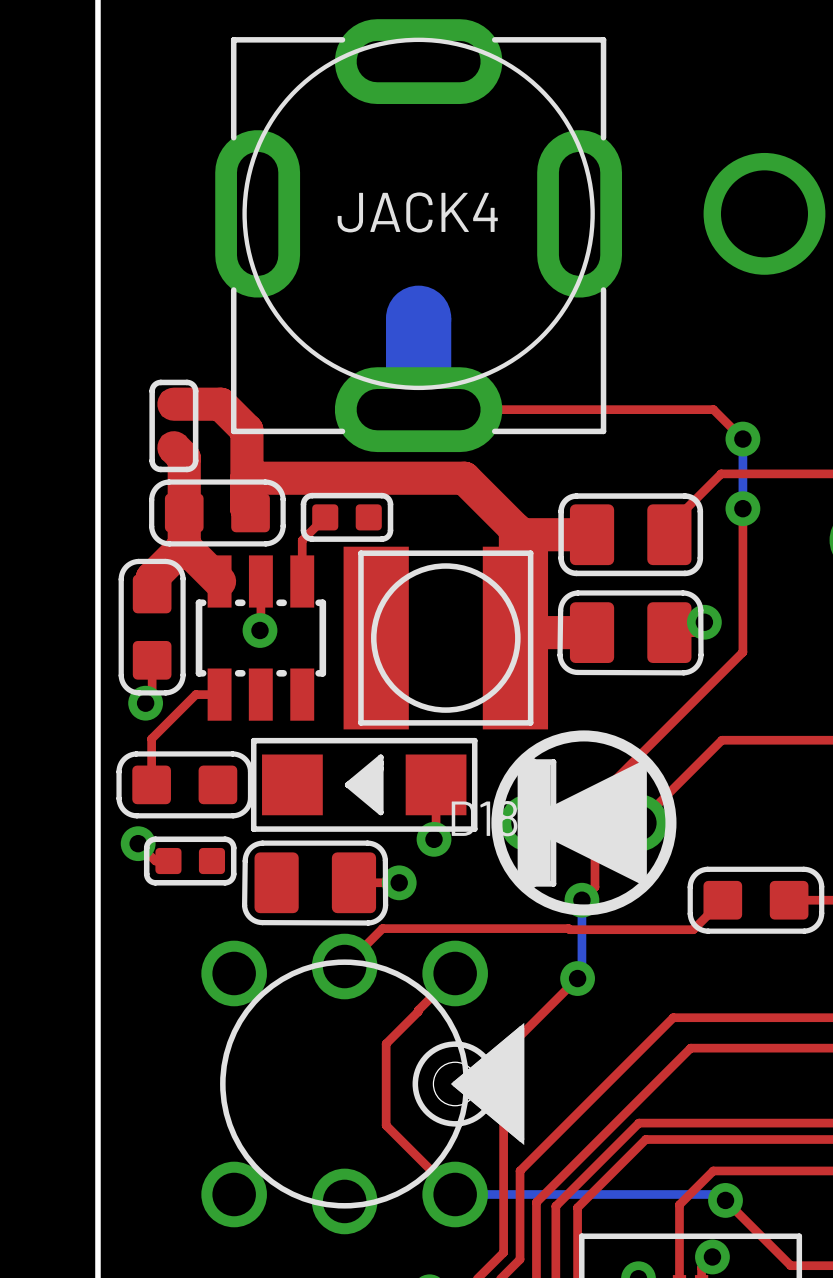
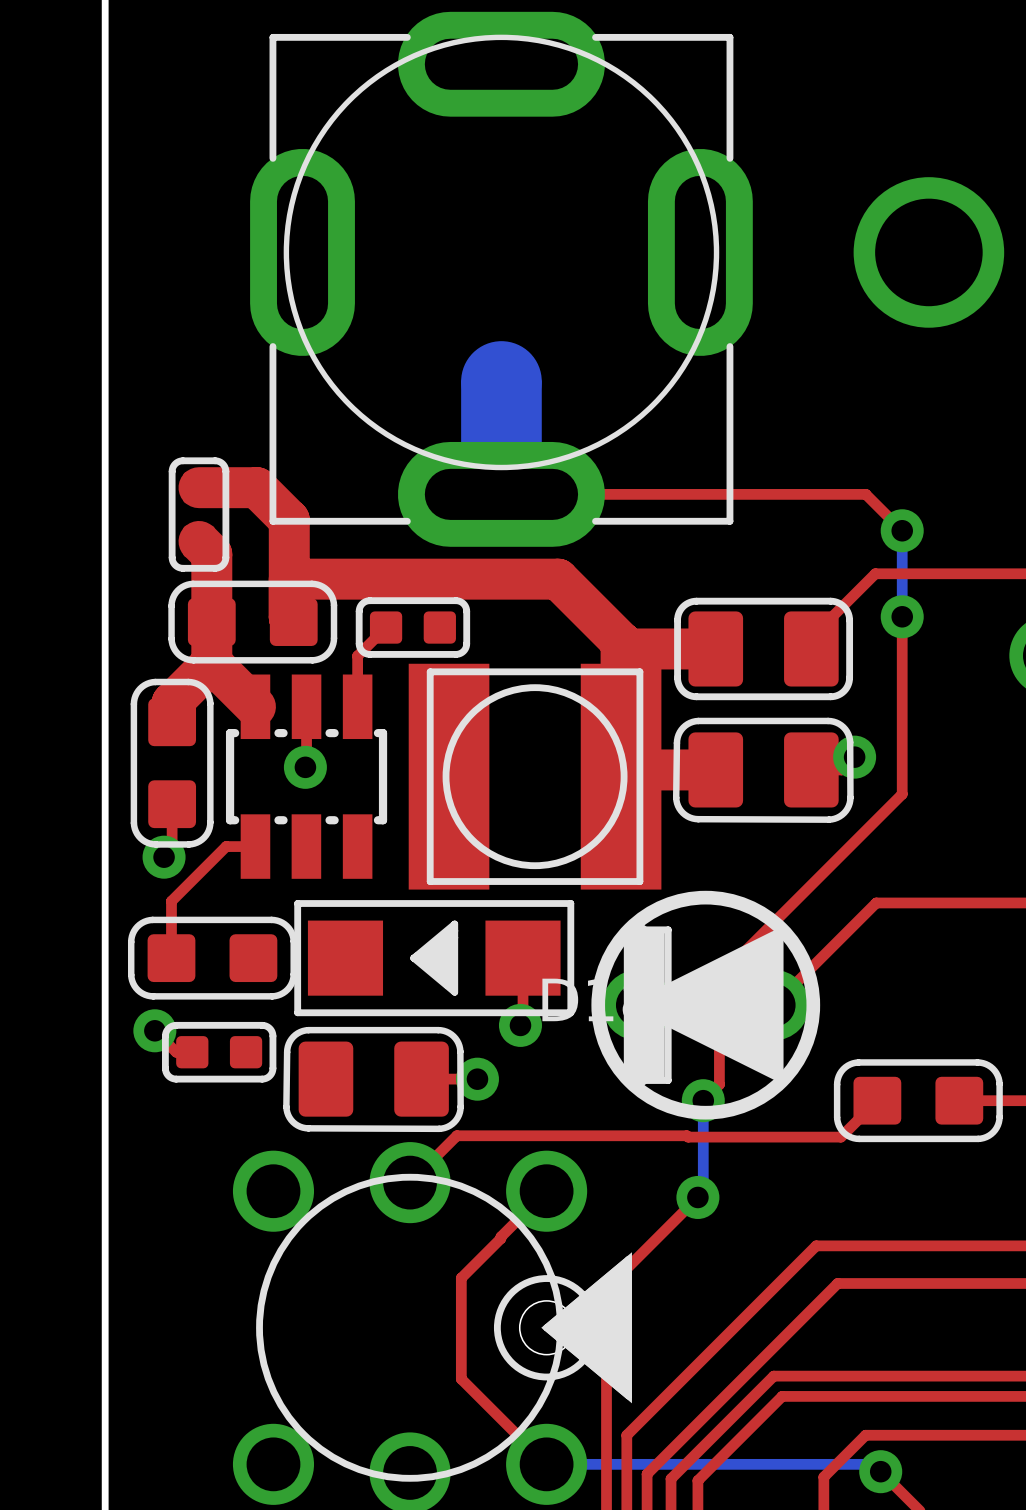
JACK4 name: JACK4 (417, 212) -> none

